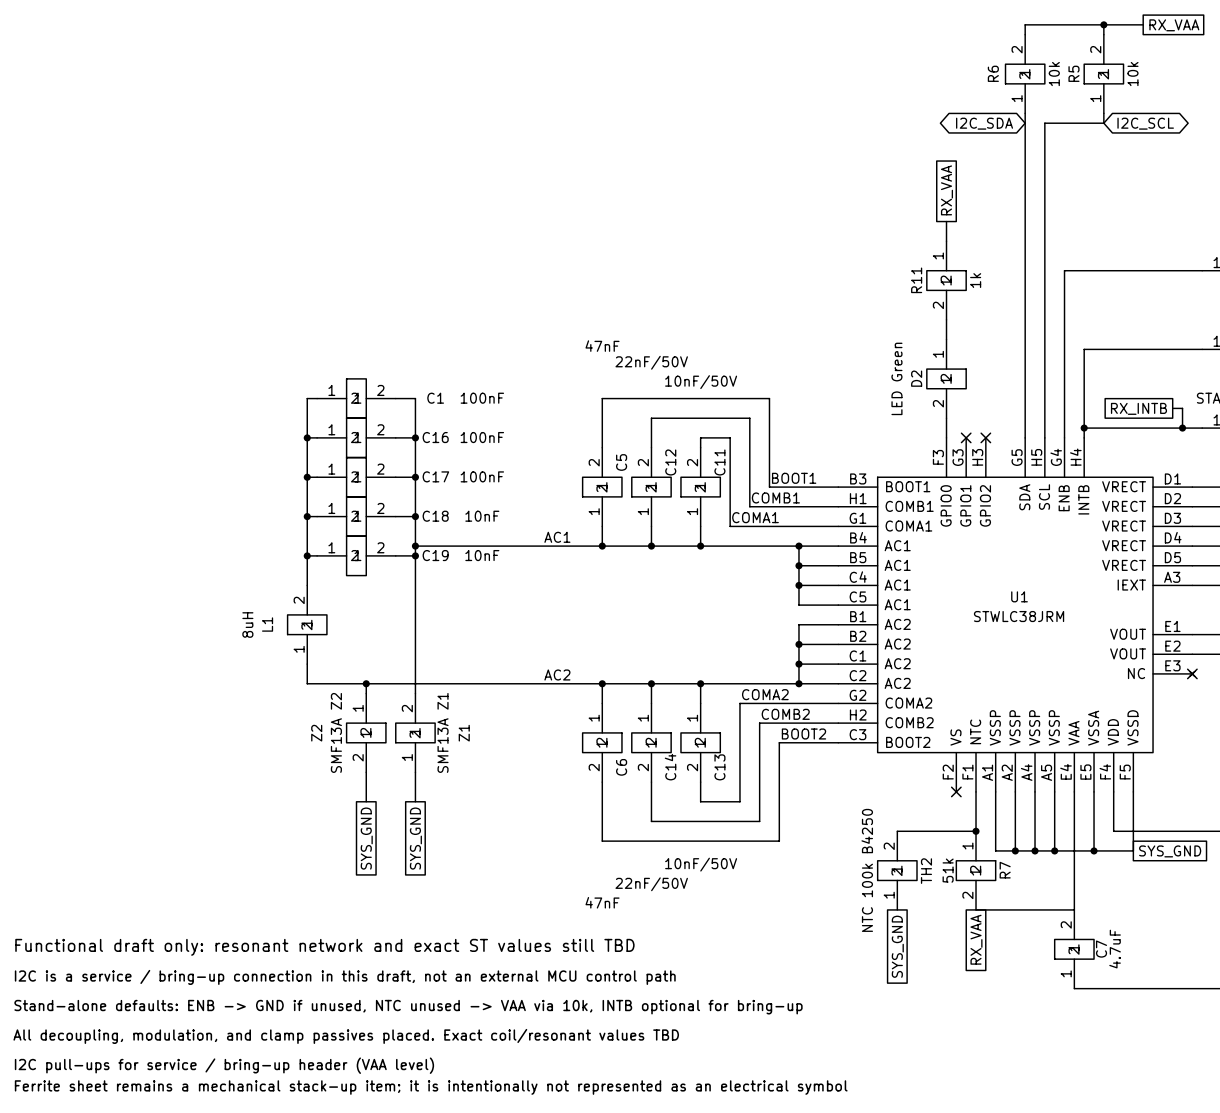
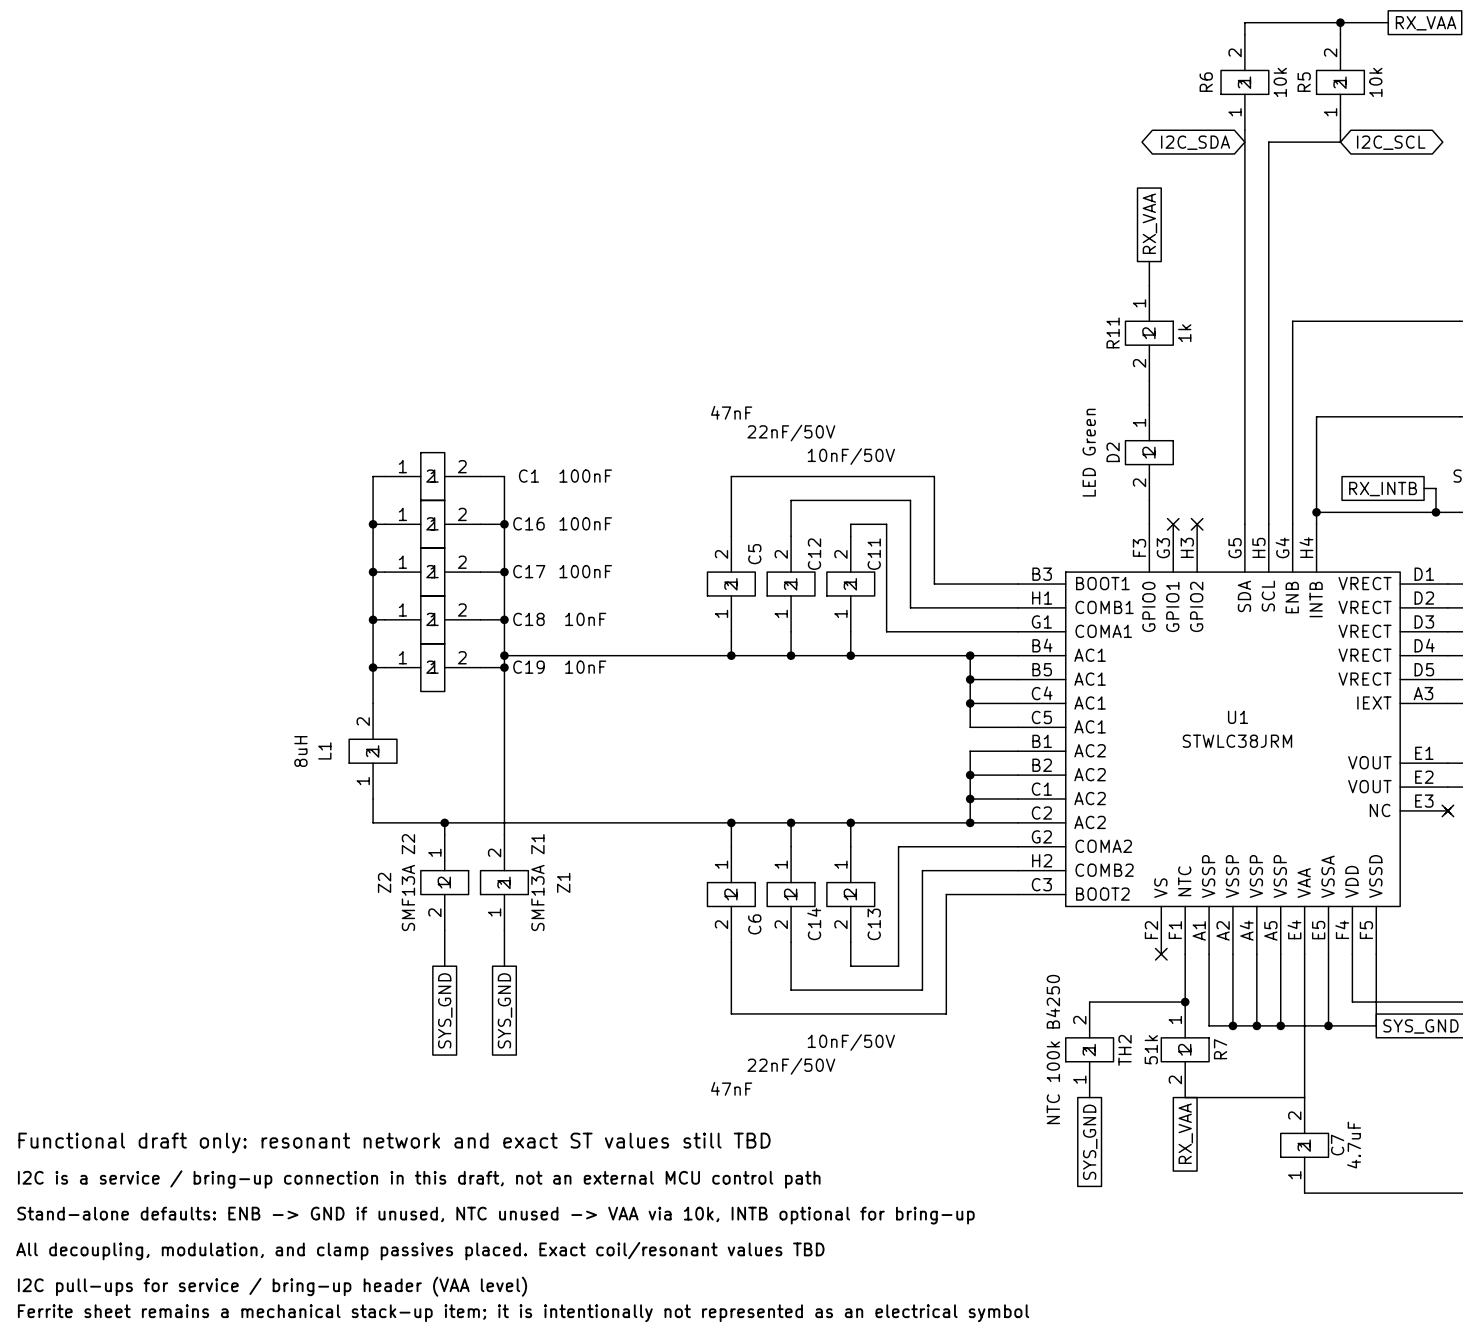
label: BOOT1 (794, 478) -> none
label: COMB1 (775, 497) -> none
label: COMA1 (755, 517) -> none
label: AC1 (557, 537) -> none
label: AC2 (557, 674) -> none
label: COMA2 (765, 694) -> none
label: COMB2 (785, 714) -> none
label: BOOT2 (803, 734) -> none

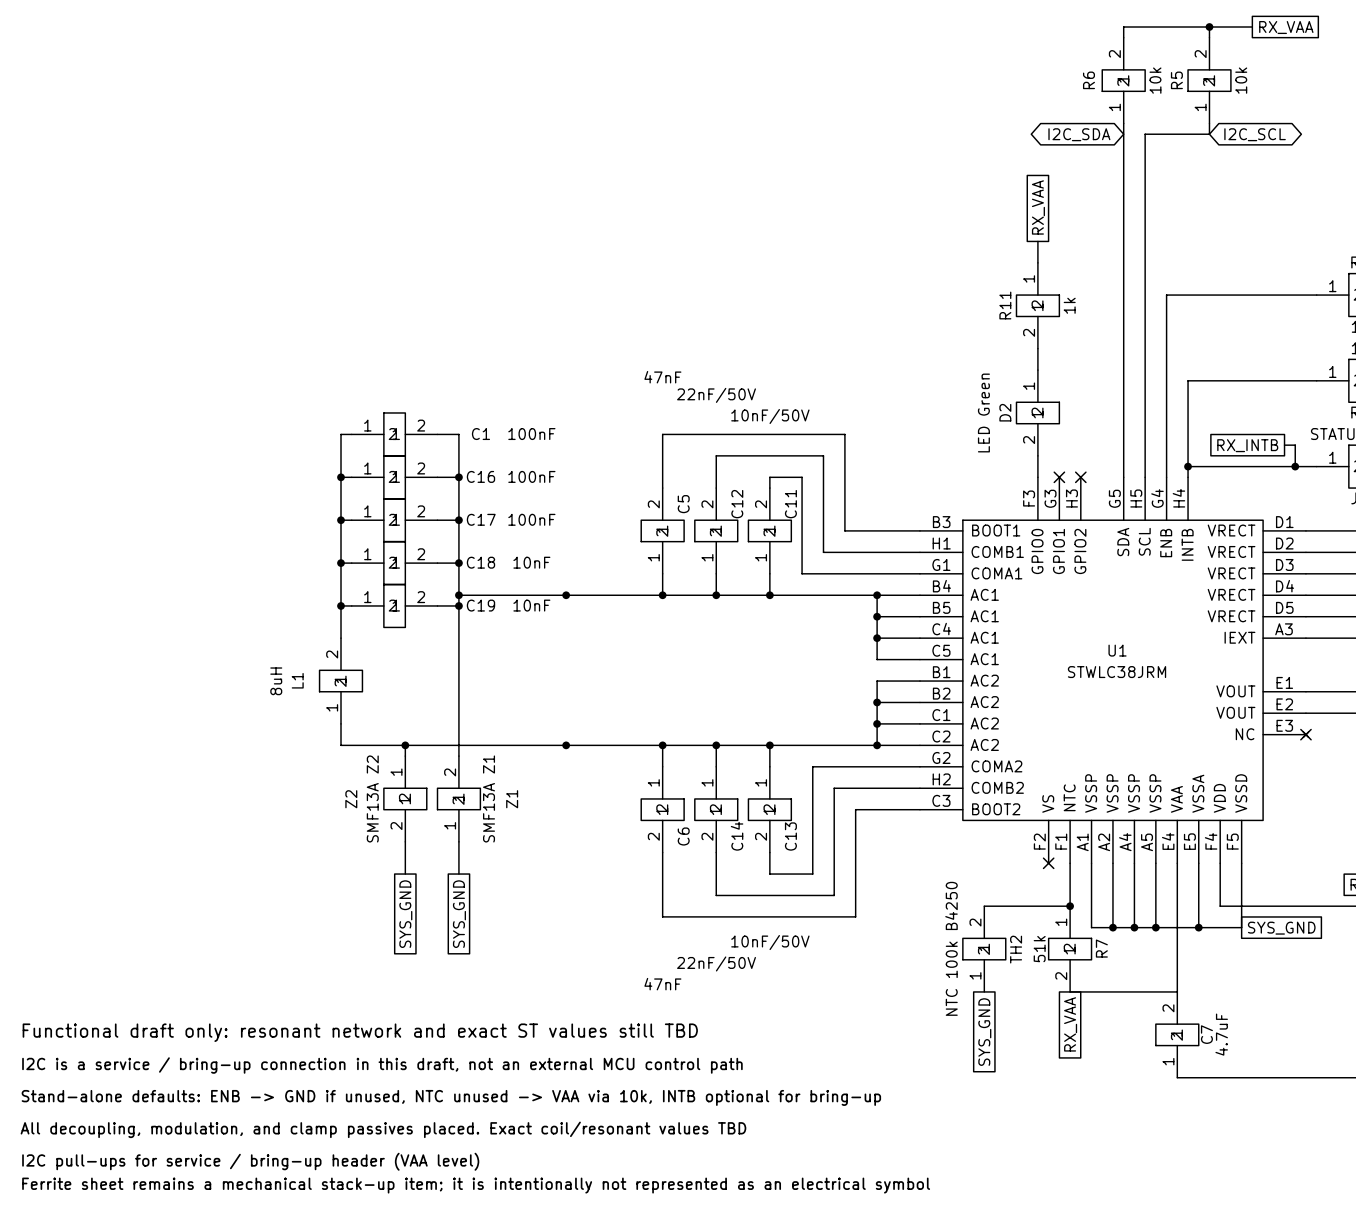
junction: none -> (566, 595)
junction: none -> (566, 745)

